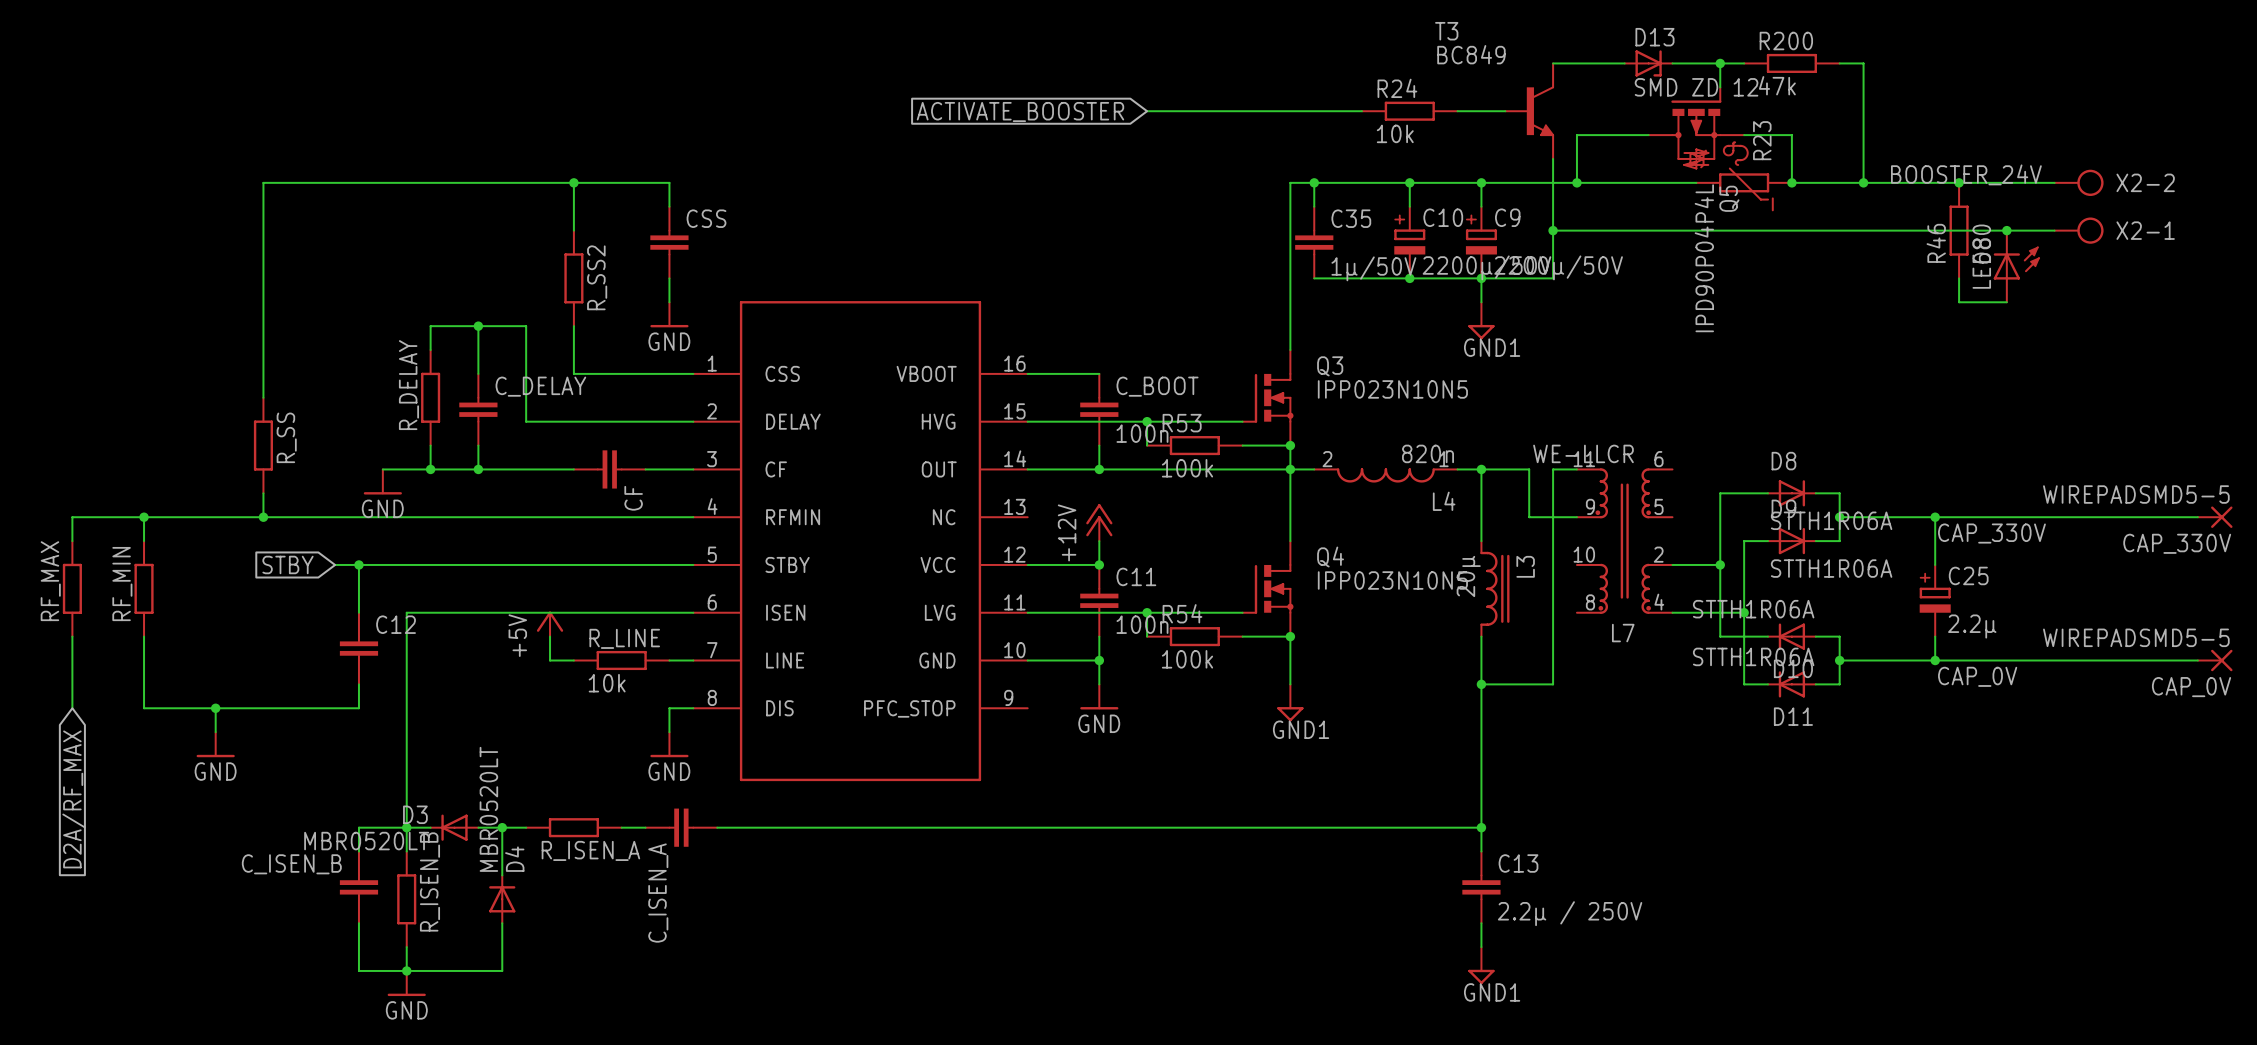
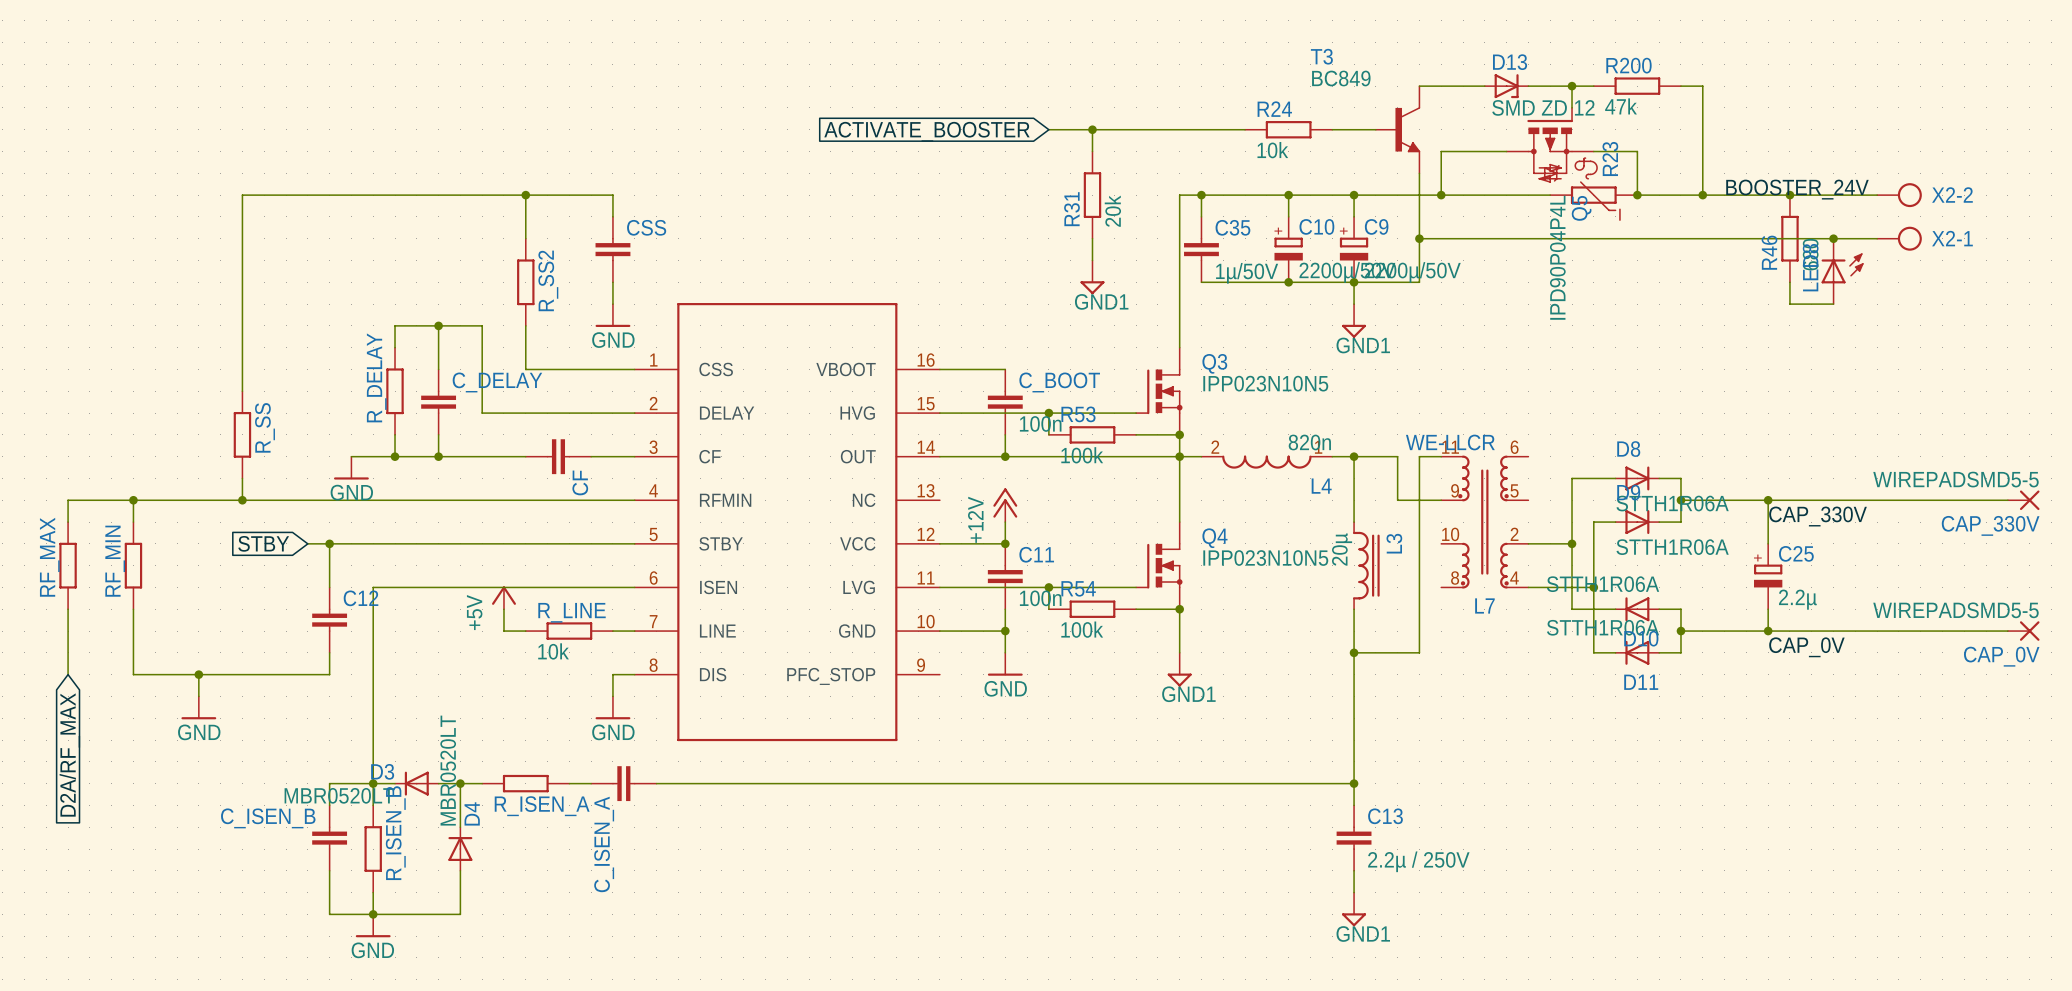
wire: none -> (1092, 129) (1092, 151)
junction: none -> (1092, 129)
R31: none -> 20k (1092, 195)
wire: none -> (1092, 238) (1092, 260)
power symbol: none -> GND1 (1092, 277)

